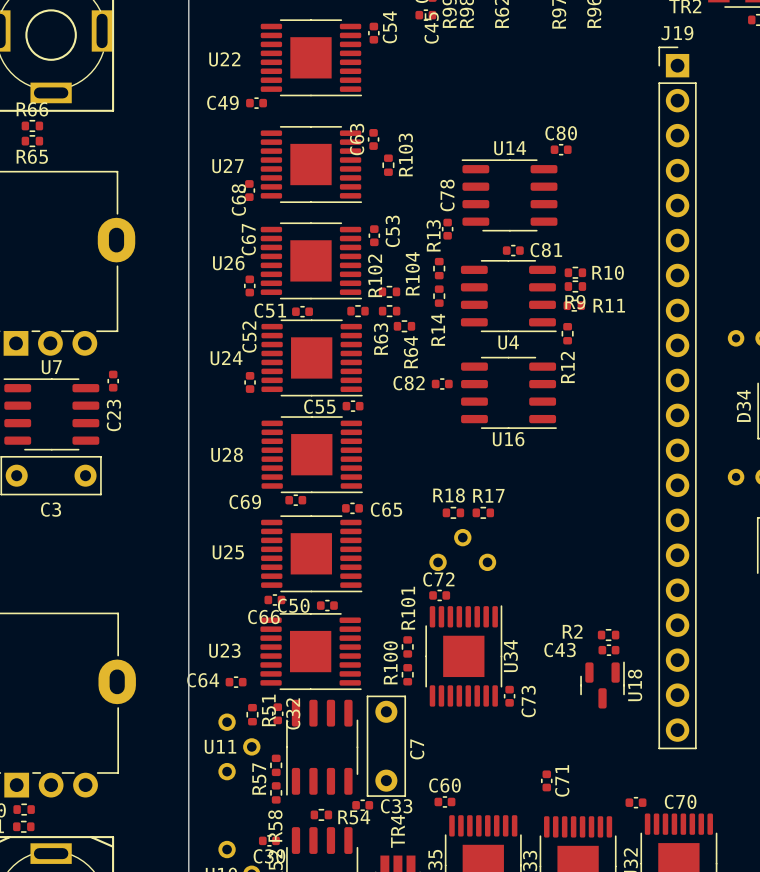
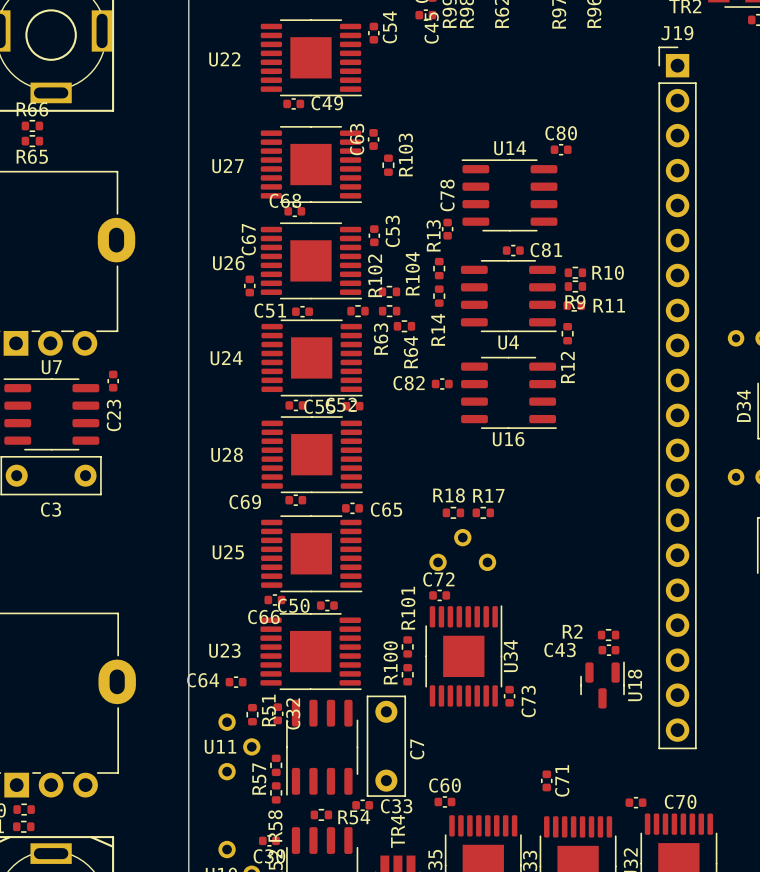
C49 name position: C49 (222, 102) -> C49 (327, 103)
C49 position: (256, 103) -> (293, 103)
C68 rotation: 0° (249, 190) -> 90° clockwise (294, 211)
C68 position: (249, 190) -> (294, 211)
C52 rotation: 0° (250, 382) -> 90° clockwise (295, 405)
C52 position: (250, 382) -> (295, 405)

